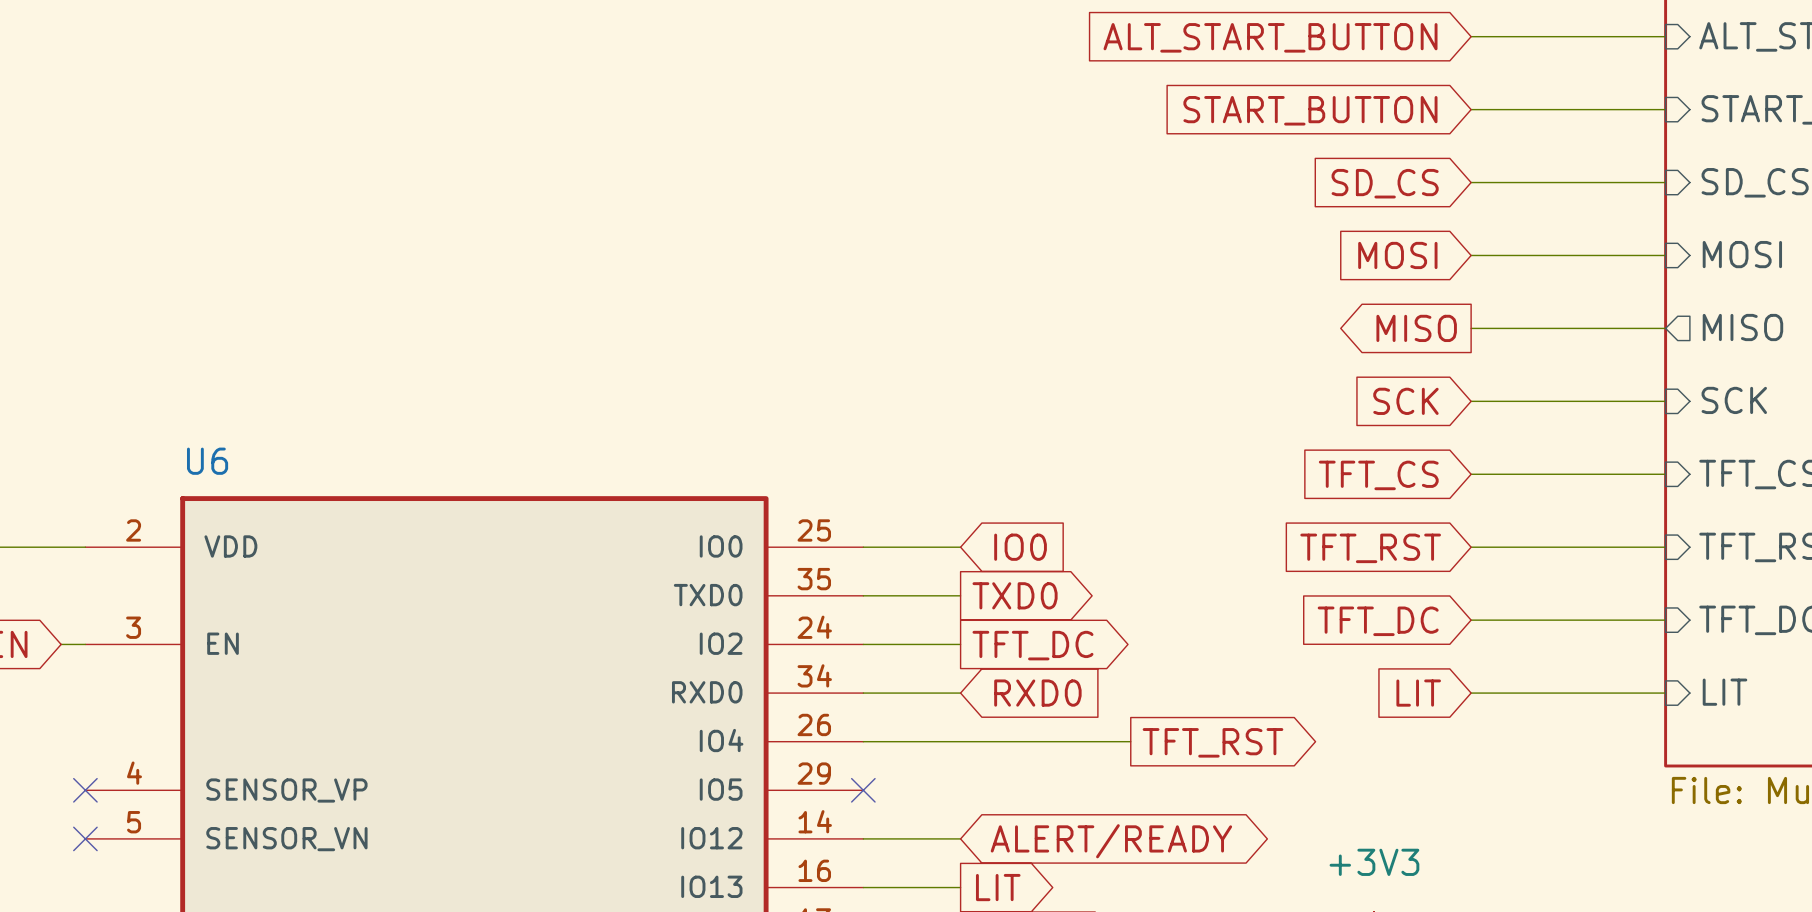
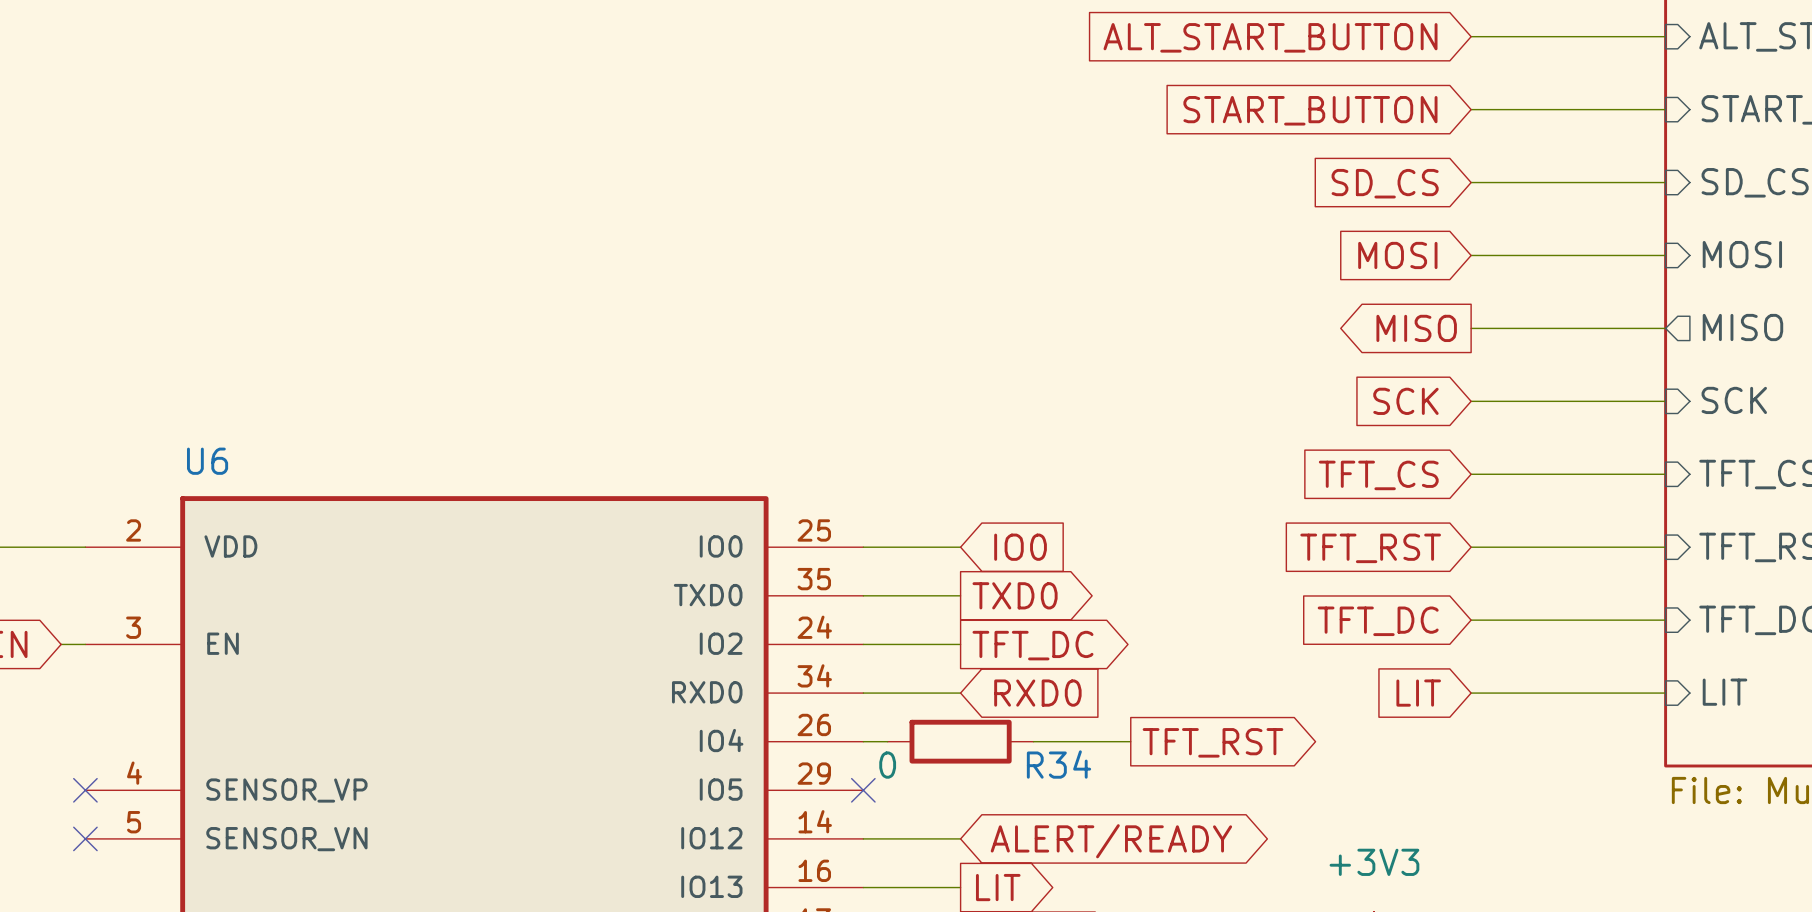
wire: (887, 741) (1033, 741) -> none
R34: none -> 0 (960, 741)

